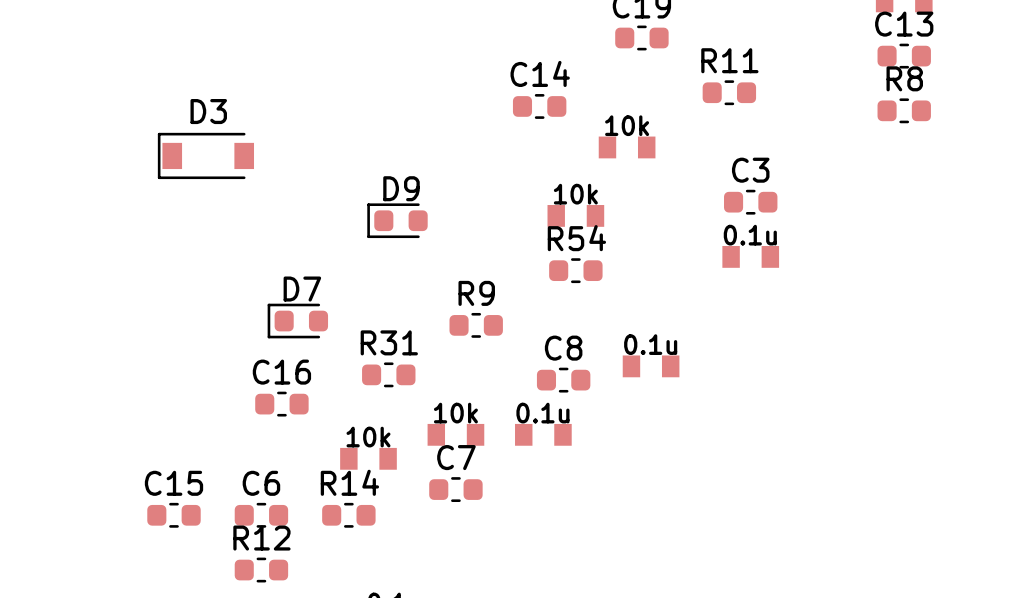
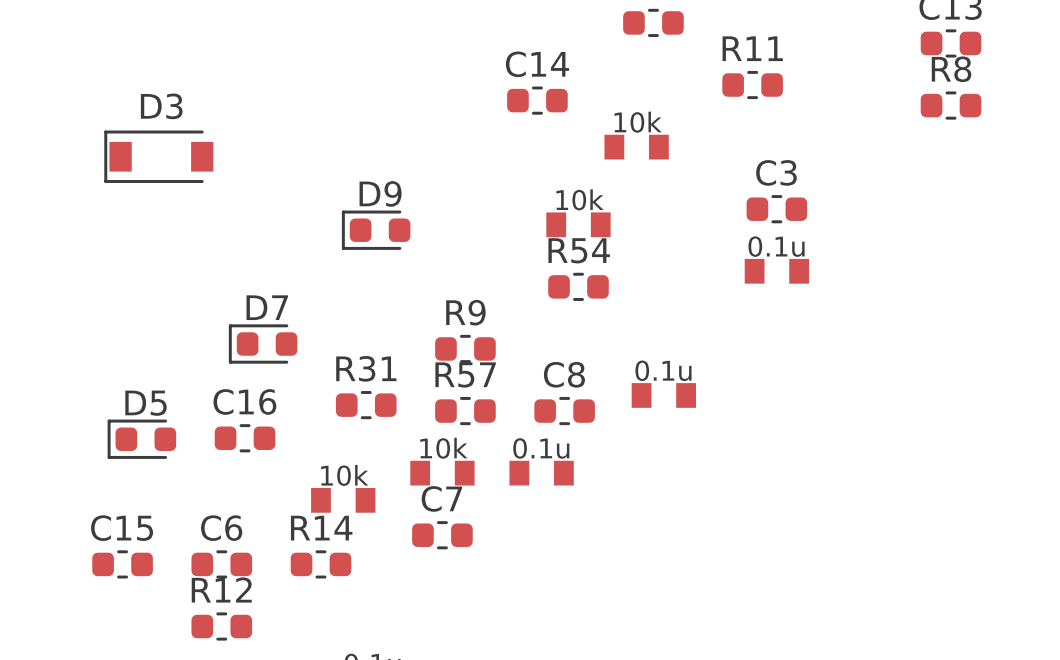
R57: none -> (465, 411)
D5: none -> (141, 439)

